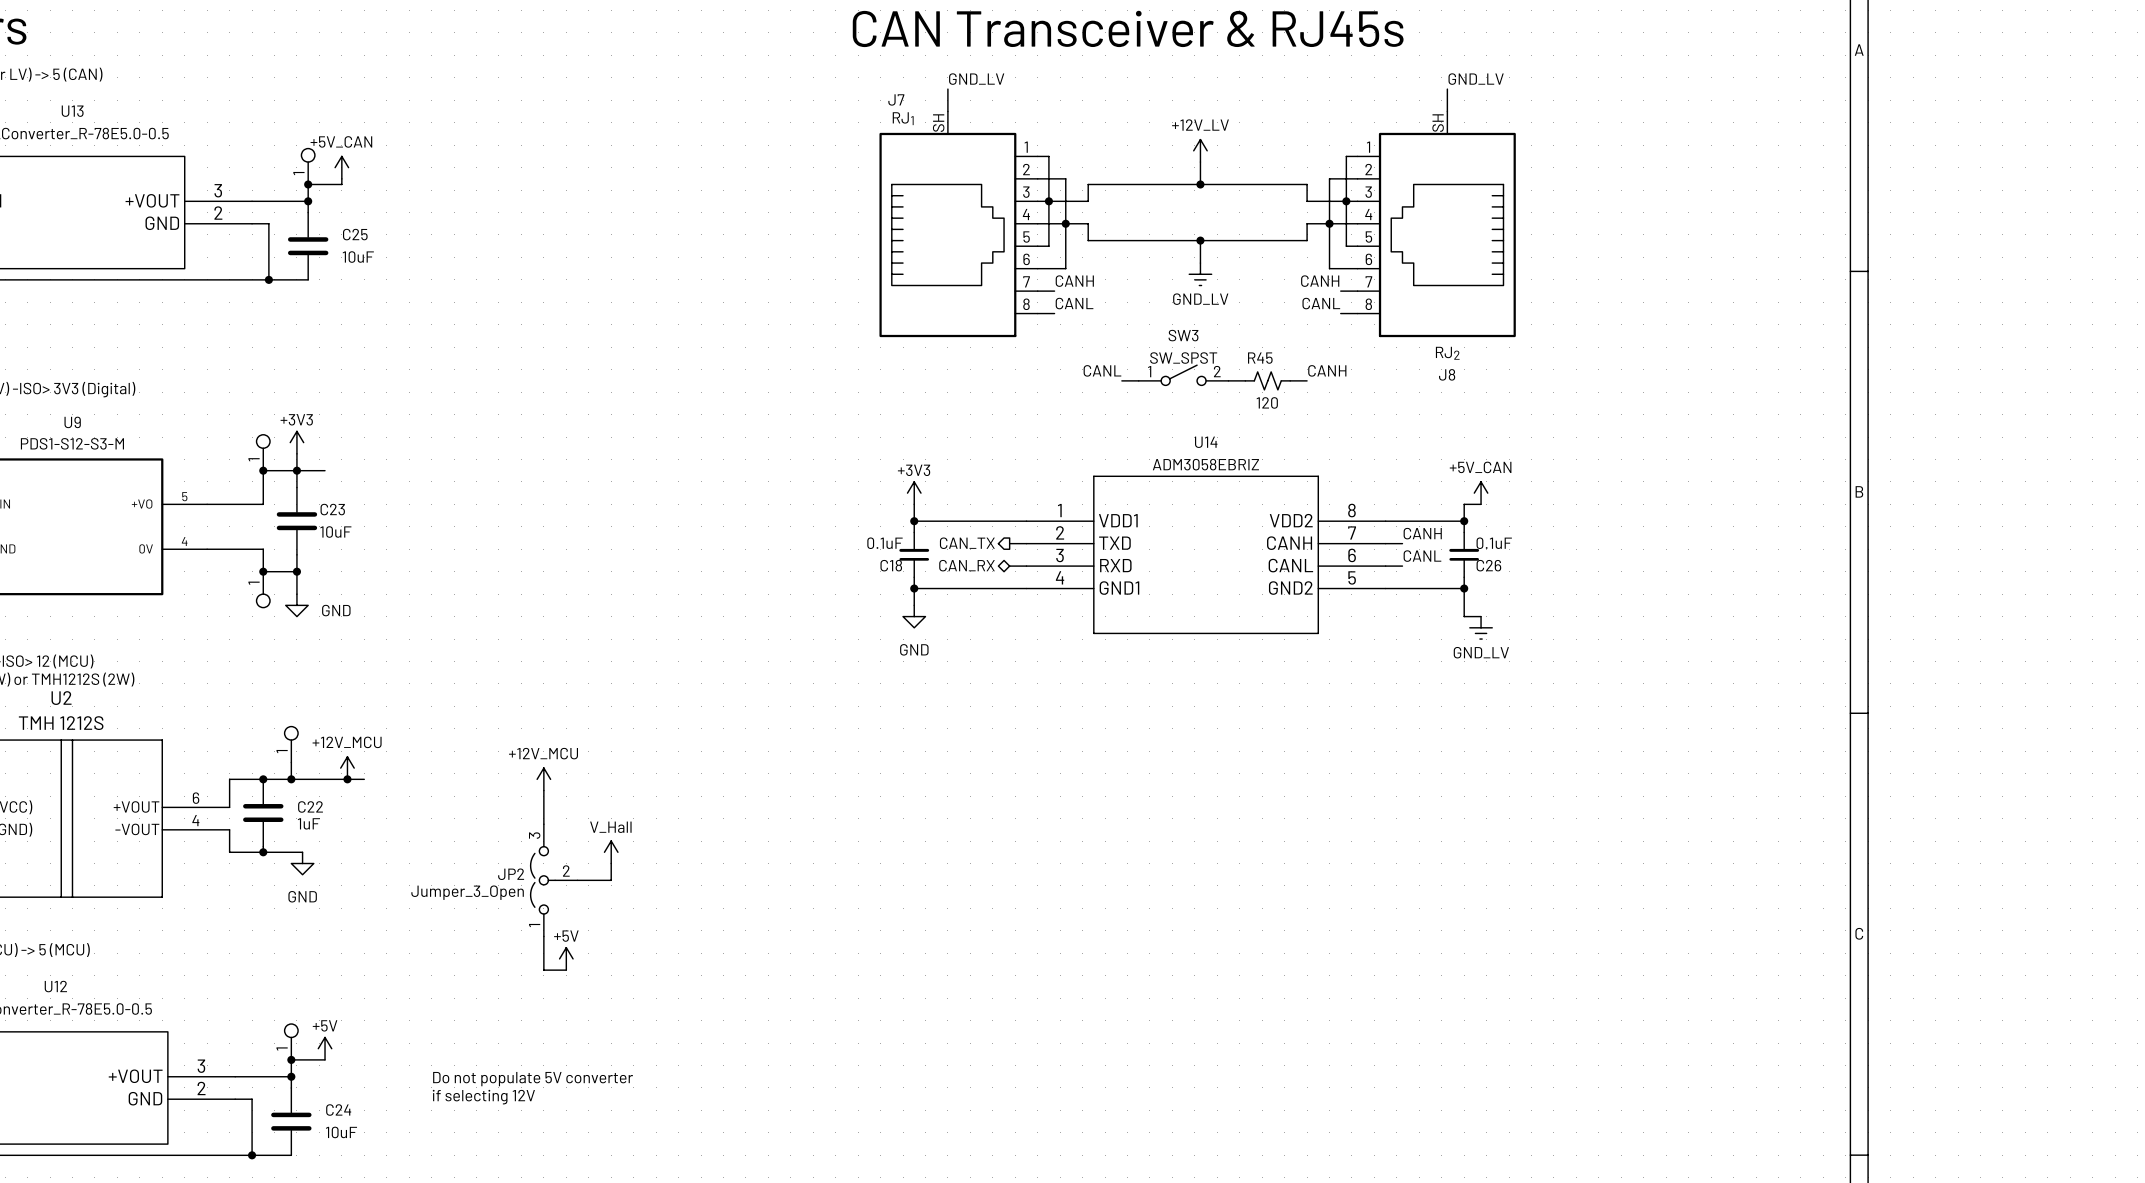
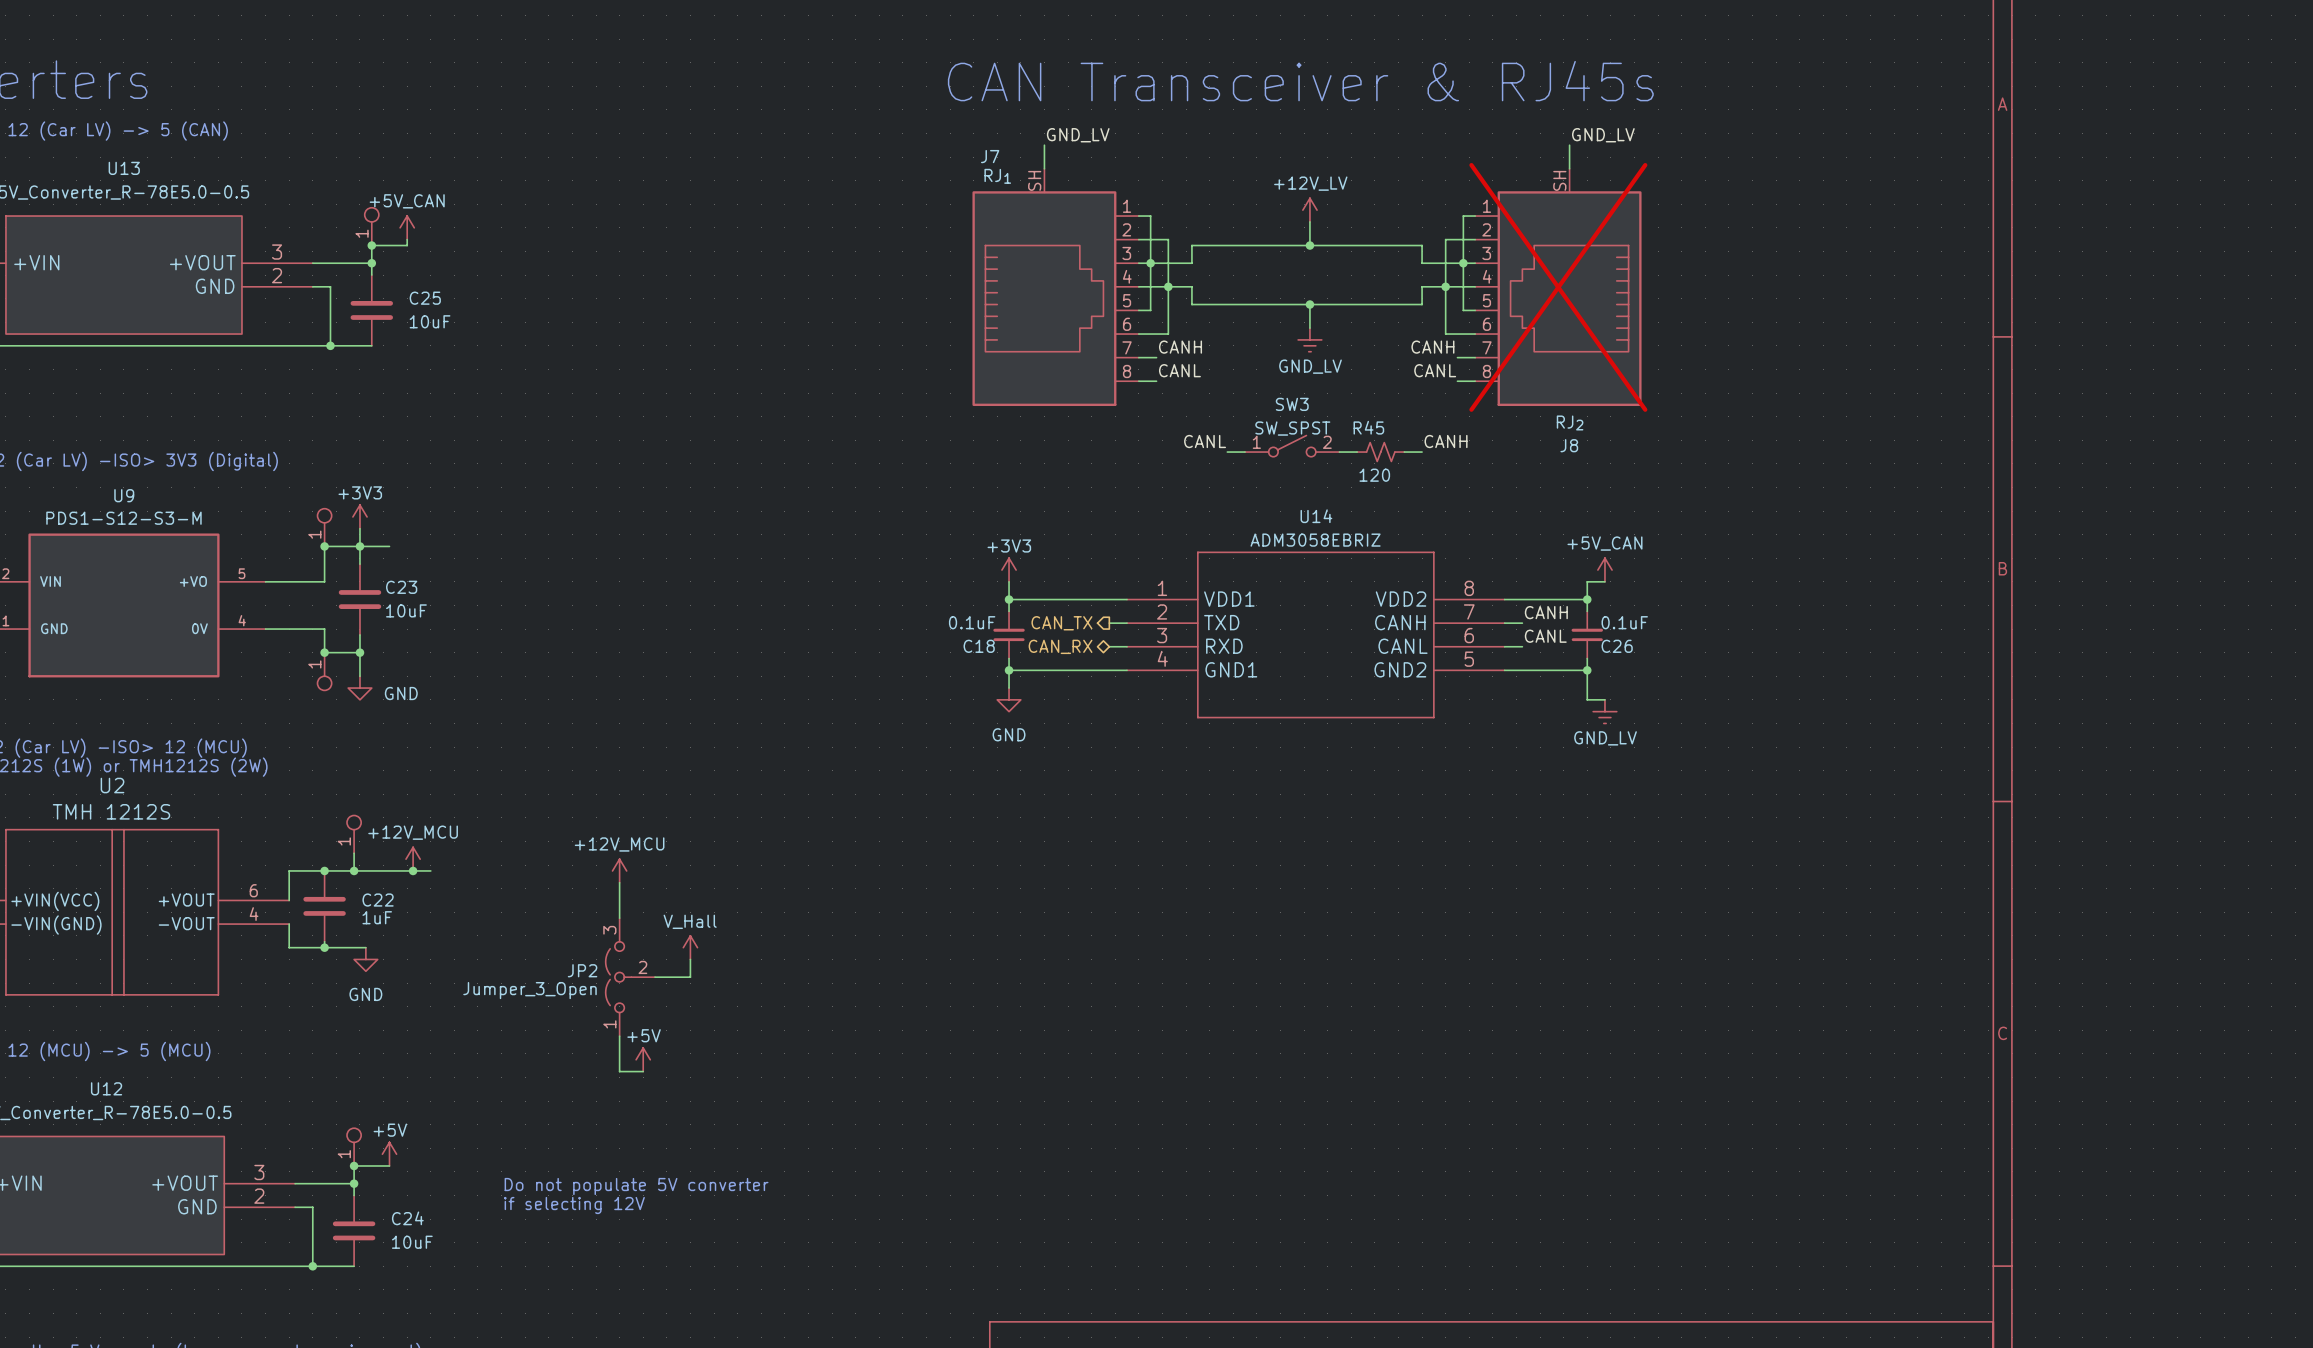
J8 do-not-place cross: none -> (1558, 287)

